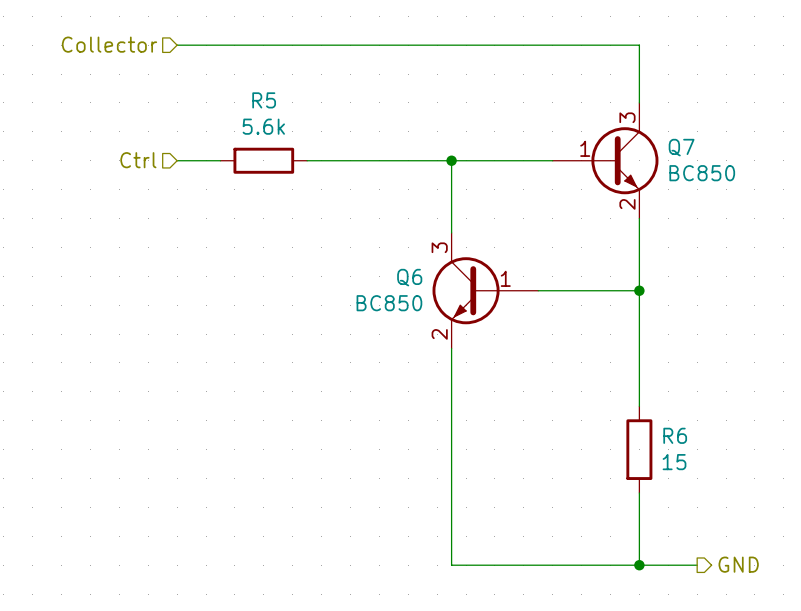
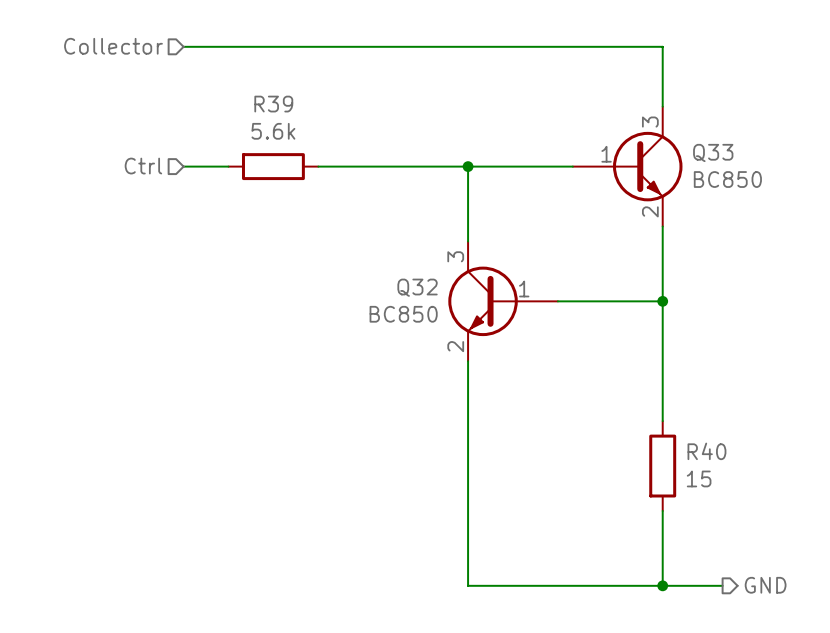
R5 name: R5 (264, 100) -> R39 (273, 104)
Q7 name: Q7 (681, 147) -> Q33 (713, 152)
Q6 name: Q6 (409, 277) -> Q32 (417, 287)
R6 name: R6 (675, 435) -> R40 (706, 451)

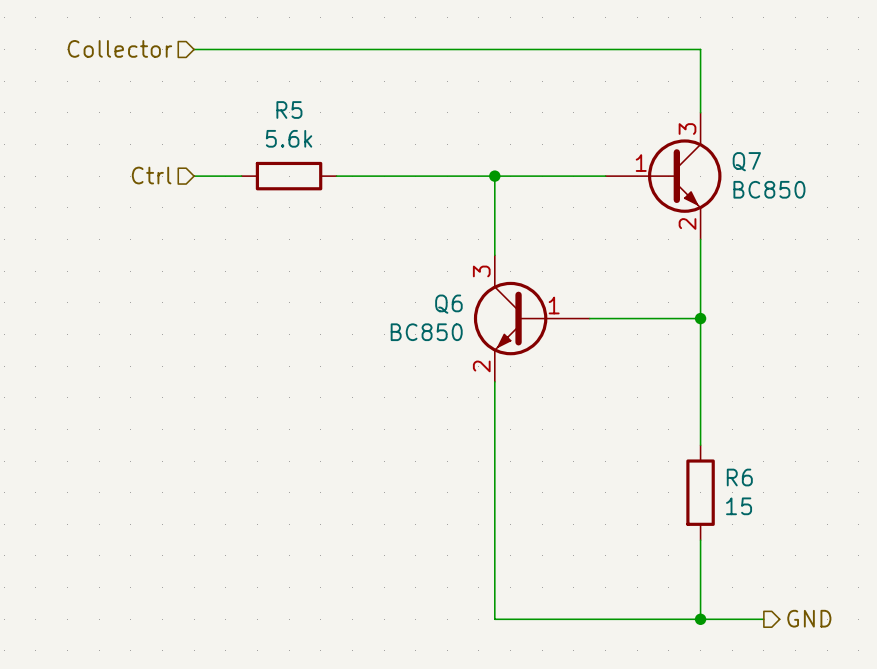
R39 name: R39 (273, 104) -> R5 (289, 110)
Q33 name: Q33 (713, 152) -> Q7 (746, 161)
Q32 name: Q32 (417, 287) -> Q6 (448, 304)
R40 name: R40 (706, 451) -> R6 (739, 477)

